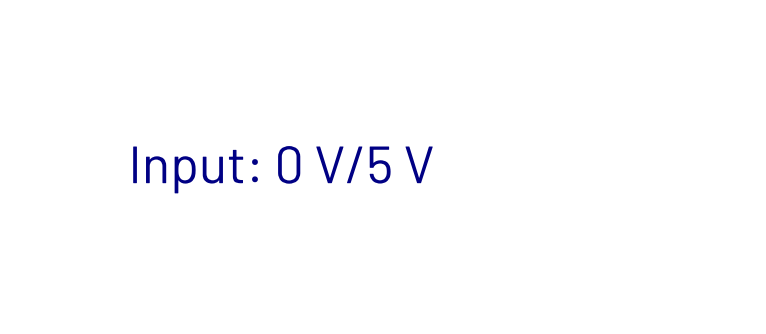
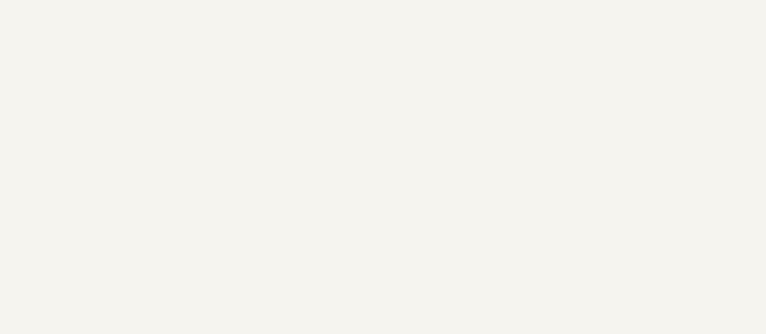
text: Input: 0 V/5 V (283, 169) -> none

